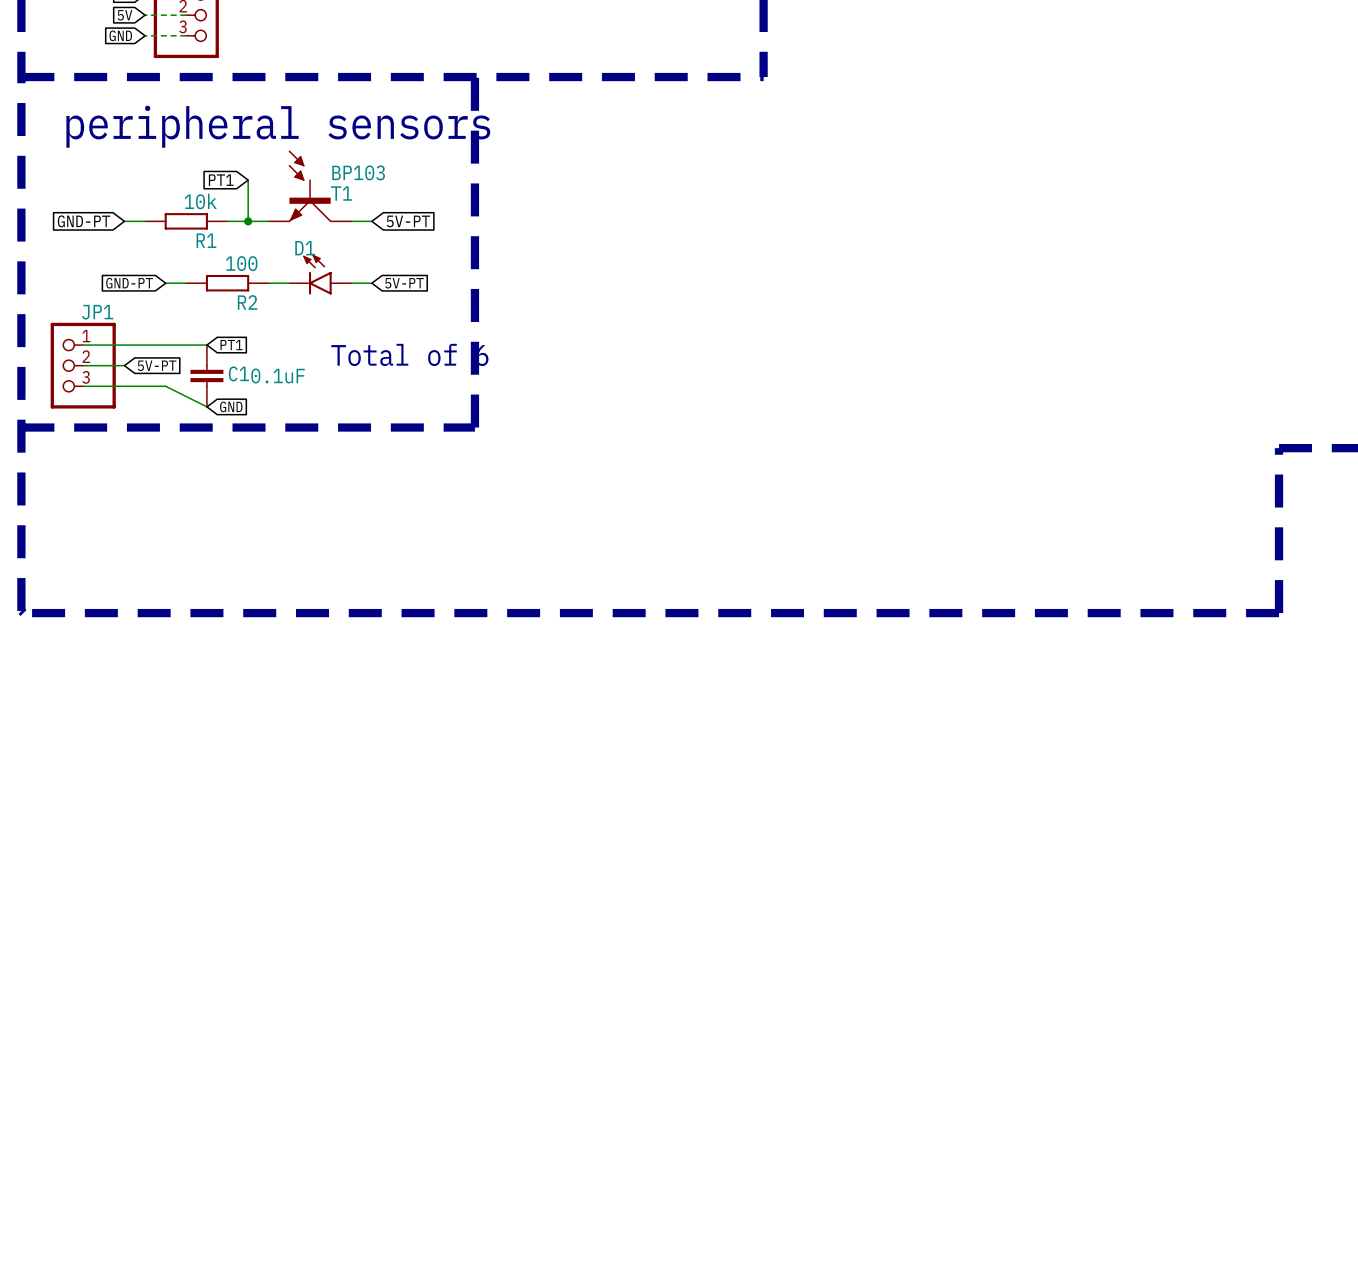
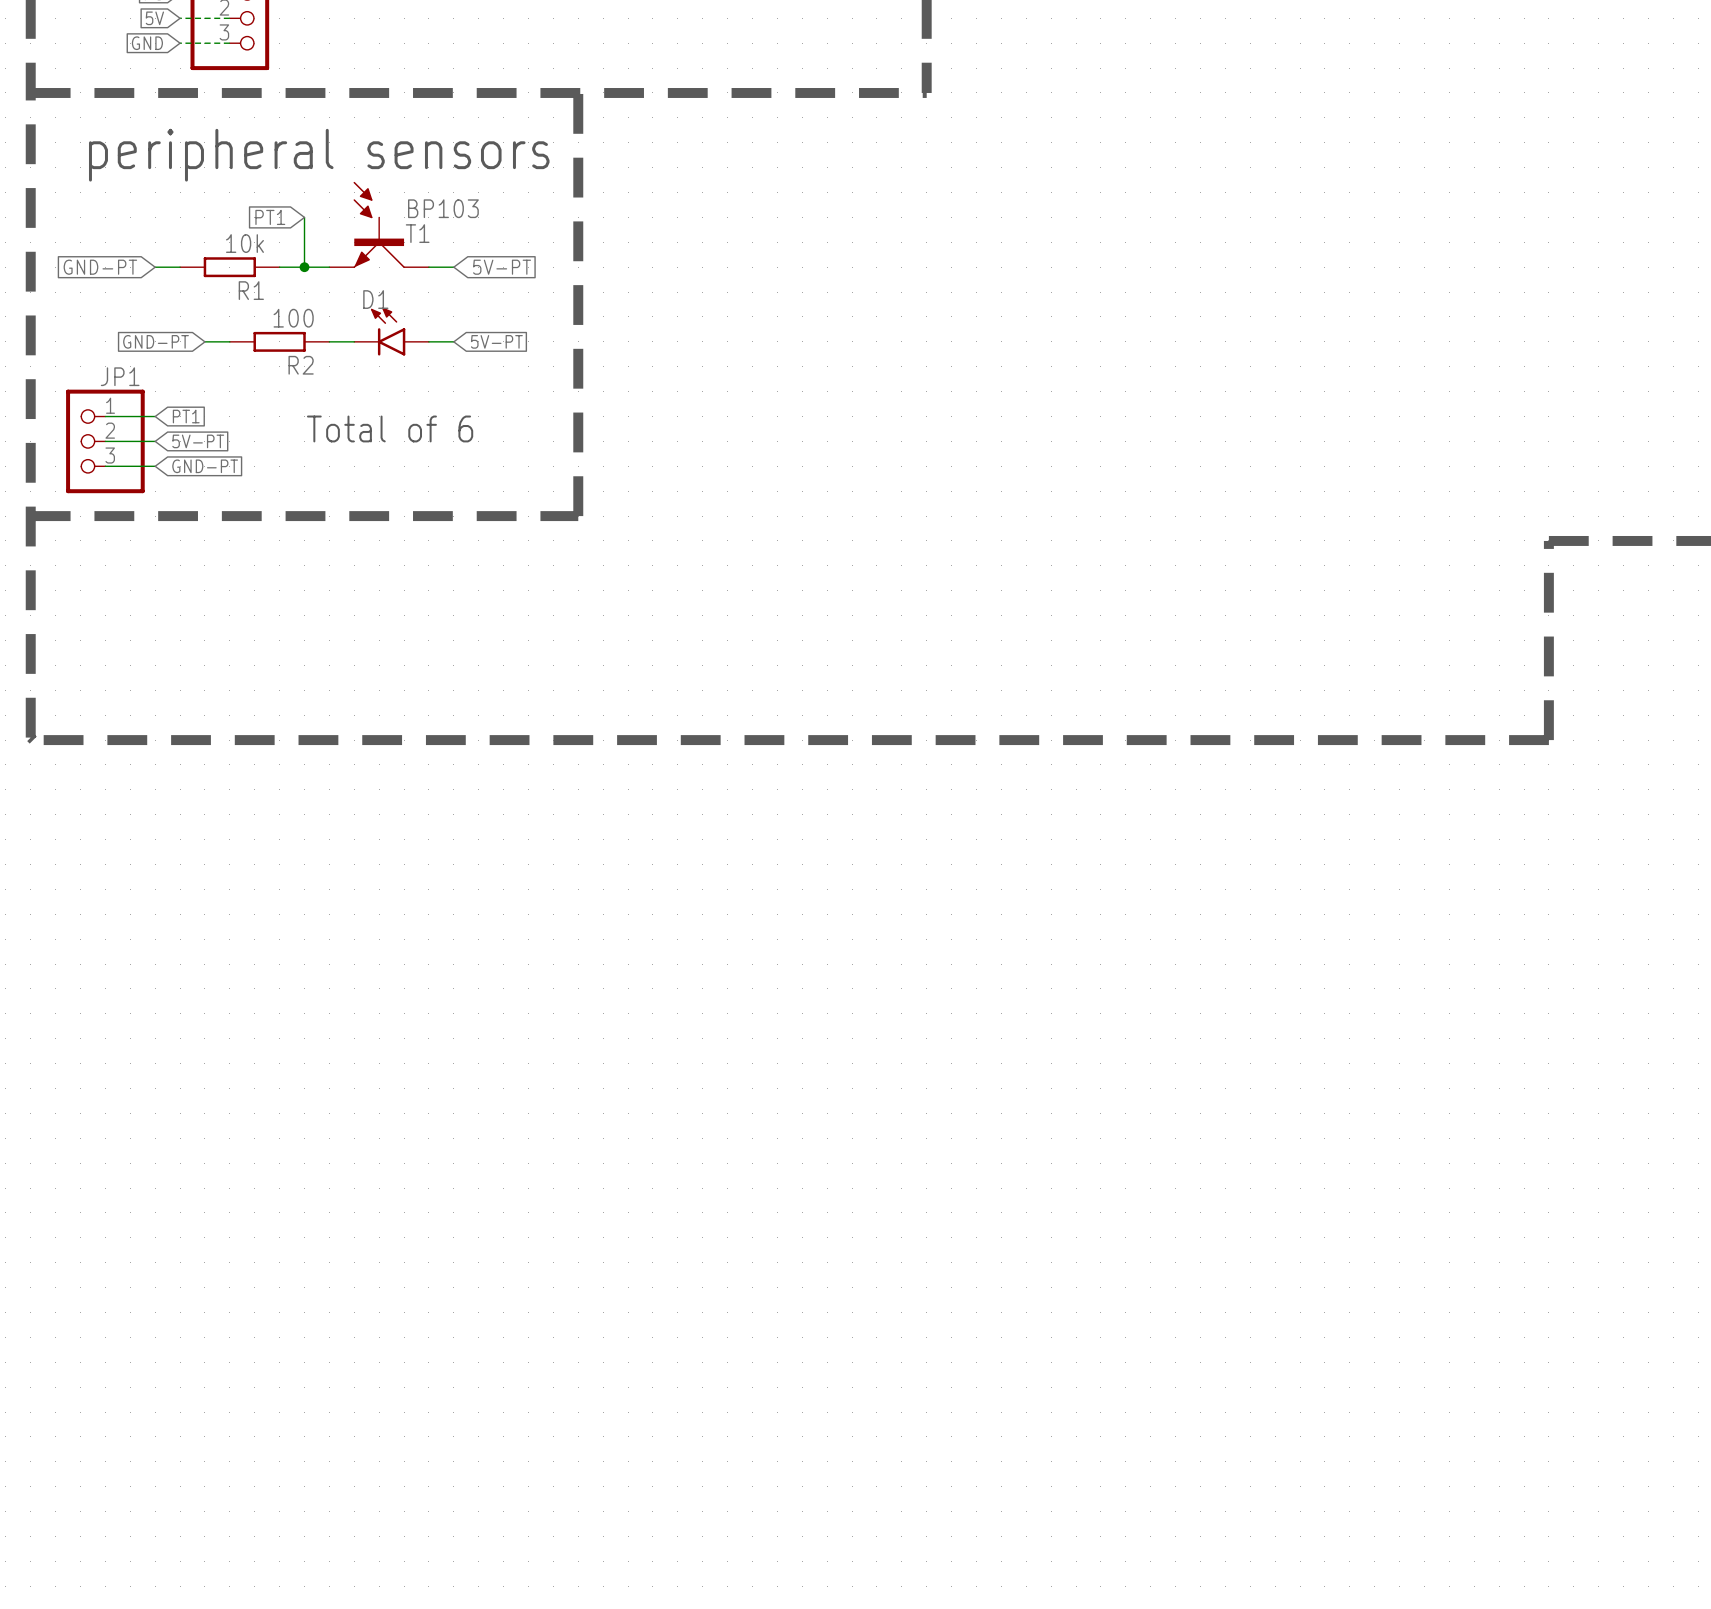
wire: (124, 345) (206, 345) -> none
global label position: PT1 (231, 345) -> PT1 (186, 416)
text position: Total of 6 (409, 354) -> Total of 6 (390, 428)
C1: 0.1uF (206, 375) -> none
wire: (124, 386) (165, 386) (206, 406) -> none
global label: GND (231, 406) -> GND-PT (205, 466)

